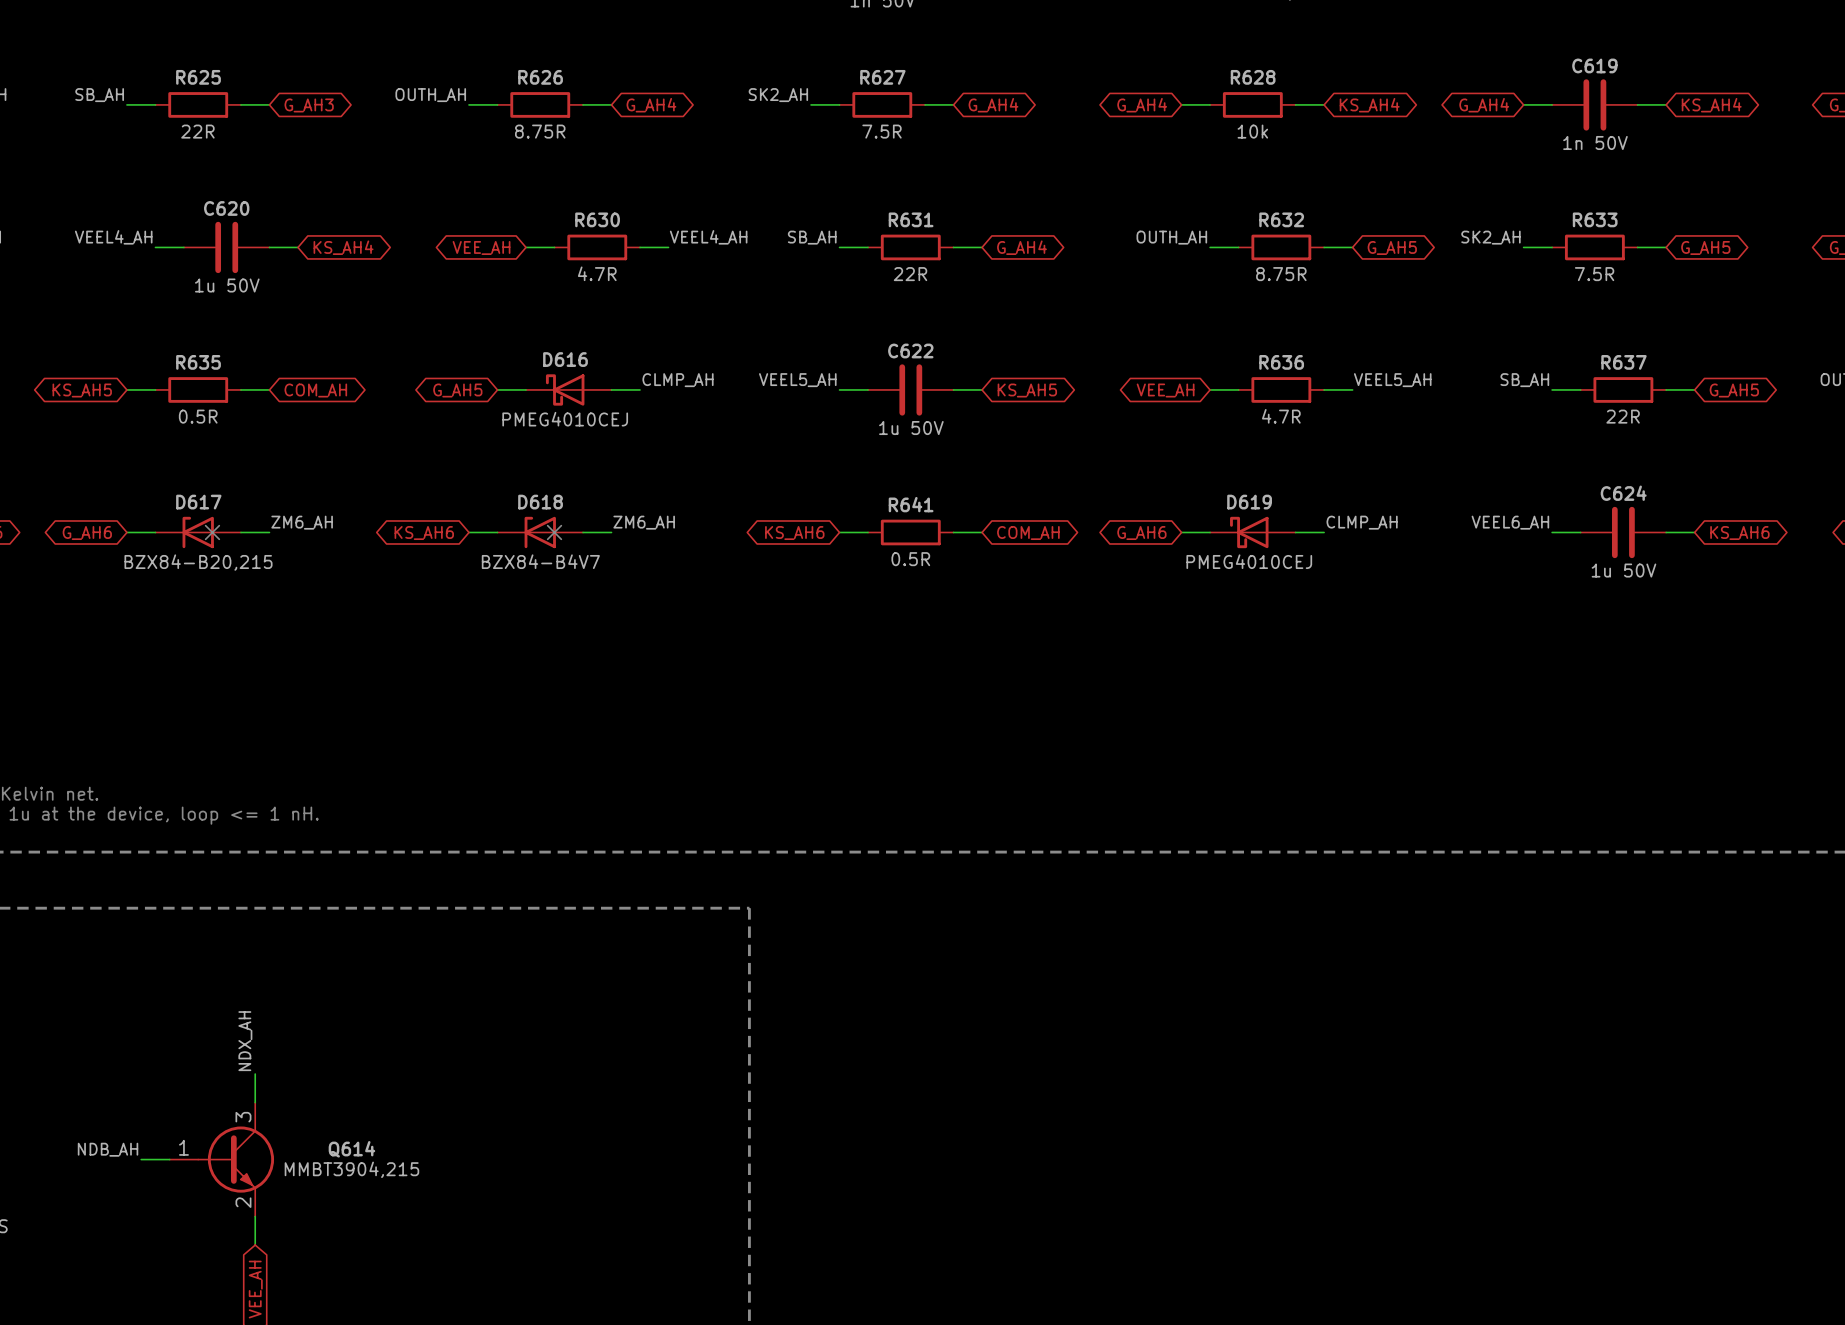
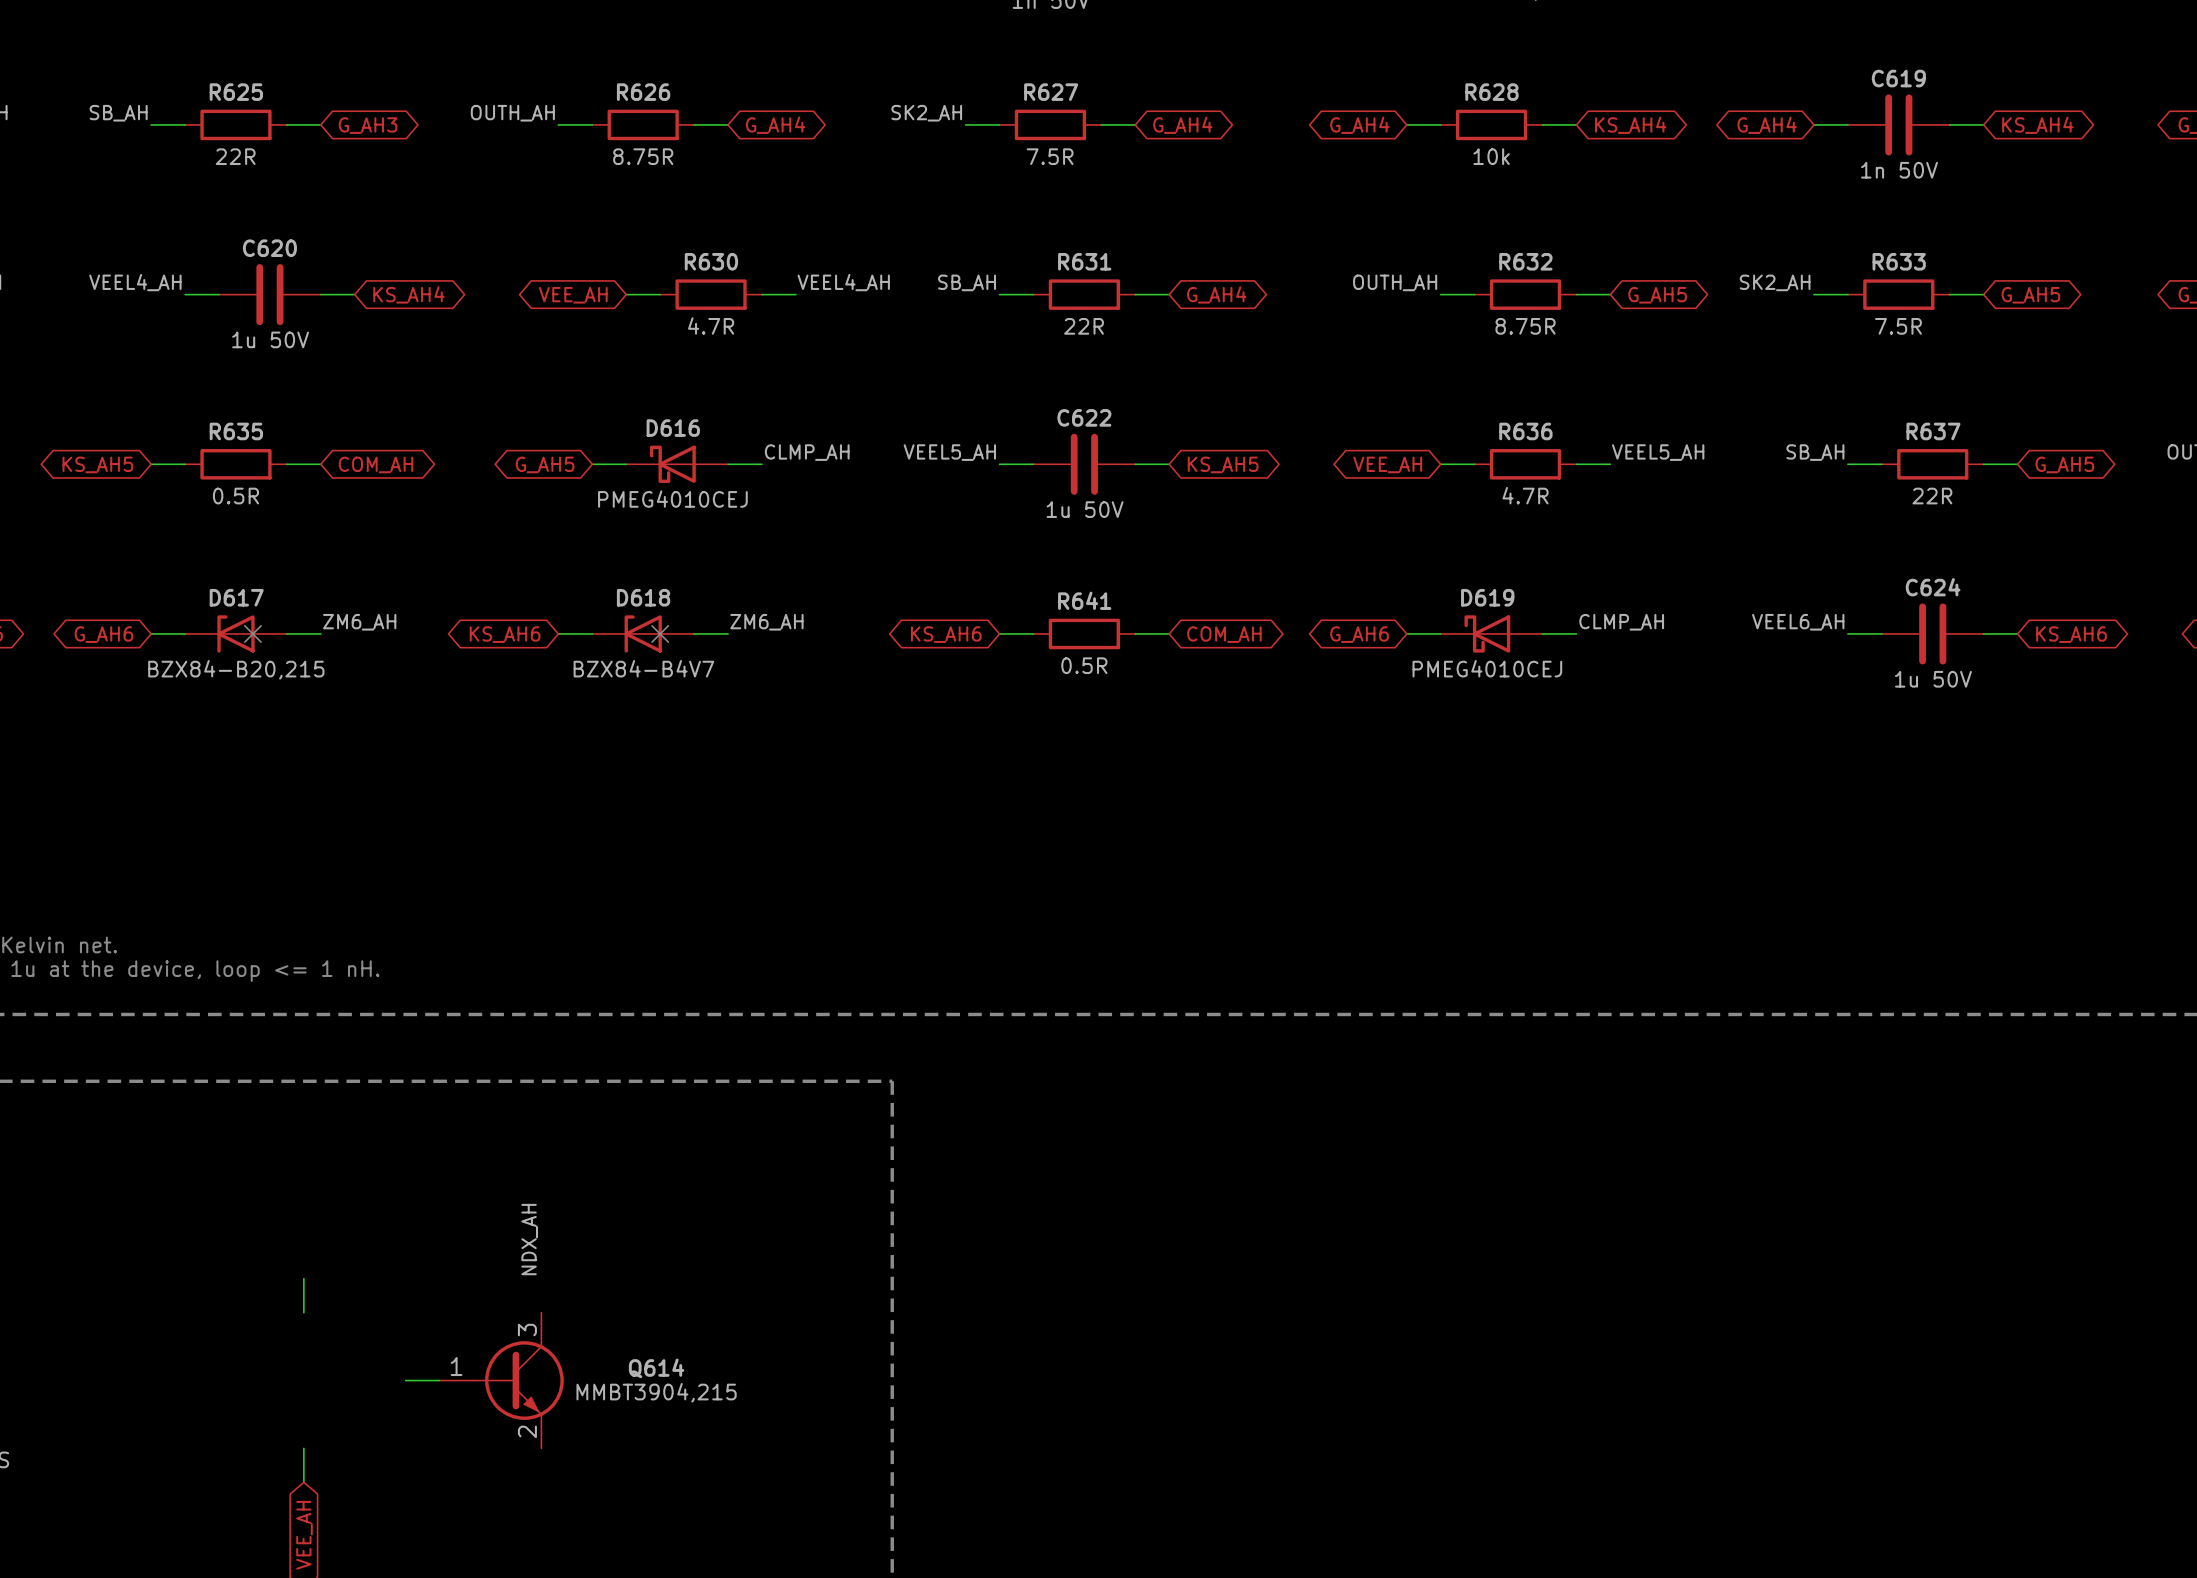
label position: NDX_AH (245, 1041) -> NDX_AH (529, 1239)
label: NDB_AH (108, 1149) -> none
wire: (141, 1159) (169, 1159) -> (405, 1380) (439, 1380)
Q614 position: (221, 1159) -> (501, 1380)

